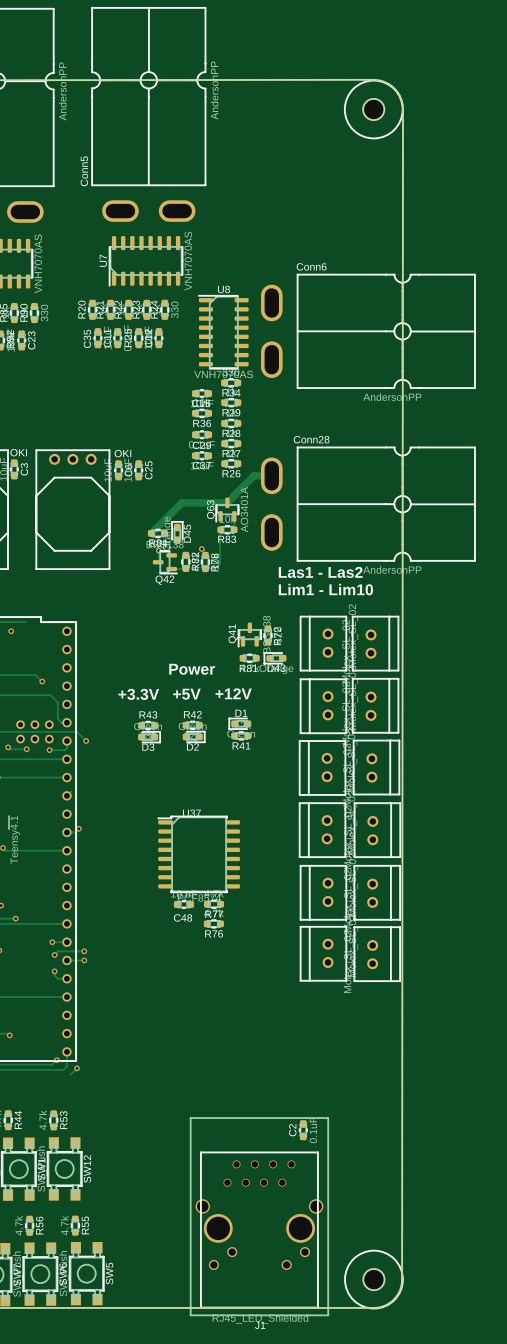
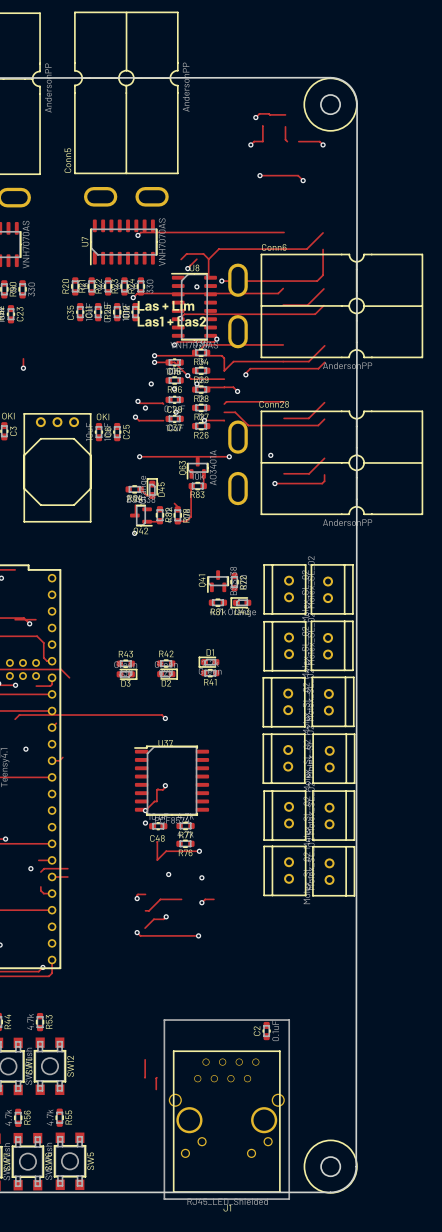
track: none -> (285, 114) (259, 113) (255, 117)
via: none -> (255, 117)
track: none -> (262, 126) (262, 141) (254, 141) (250, 144)
track: none -> (285, 126) (285, 139) (287, 141)
track: none -> (298, 141) (319, 141) (323, 144)
via: none -> (250, 144)
via: none -> (323, 144)
track: none -> (259, 175) (298, 175) (303, 180)
via: none -> (259, 175)
via: none -> (303, 180)
track: none -> (284, 232) (140, 232) (137, 235)
track: none -> (323, 232) (306, 249) (218, 249) (208, 259) (208, 277)
via: none -> (137, 235)
track: none -> (323, 249) (323, 275) (317, 281) (221, 281)
track: none -> (196, 259) (187, 268)
track: none -> (208, 259) (203, 253) (186, 253) (181, 259)
via: none -> (187, 268)
via: none -> (221, 281)
via: none -> (196, 286)
track: none -> (283, 288) (278, 293) (137, 293) (133, 297)
track: none -> (323, 288) (307, 305) (283, 305)
via: none -> (133, 297)
text: none -> Las + Lim (165, 305)
track: none -> (323, 305) (315, 314) (184, 314) (180, 318)
via: none -> (180, 318)
text: none -> Las1 + Las2 (171, 321)
track: none -> (216, 339) (213, 342) (177, 342) (174, 344)
via: none -> (216, 339)
via: none -> (174, 344)
track: none -> (283, 344) (204, 344) (201, 348)
track: none -> (324, 345) (308, 361) (233, 361) (224, 370) (224, 358) (221, 355) (154, 355)
via: none -> (154, 355)
track: none -> (23, 358) (23, 368)
track: none -> (154, 362) (174, 362) (191, 379) (224, 379)
via: none -> (154, 362)
track: none -> (324, 362) (318, 368) (250, 368) (245, 374)
via: none -> (23, 368)
via: none -> (245, 374)
via: none -> (187, 375)
via: none -> (151, 383)
track: none -> (196, 383) (200, 387) (233, 387) (237, 391)
via: none -> (196, 383)
via: none -> (174, 388)
via: none -> (237, 391)
track: none -> (137, 401) (139, 403) (163, 404)
via: none -> (137, 401)
track: none -> (284, 401) (226, 401) (224, 404)
track: none -> (324, 402) (308, 418) (284, 418)
via: none -> (145, 408)
via: none -> (176, 412)
track: none -> (224, 412) (235, 412) (248, 425) (318, 425) (324, 419)
track: none -> (135, 417) (139, 420) (163, 420)
via: none -> (135, 417)
track: none -> (204, 420) (224, 420)
via: none -> (204, 420)
track: (271, 475) (253, 475) (227, 502) (181, 502) (151, 533) -> none
via: none -> (270, 455)
track: none -> (139, 456) (229, 456)
via: none -> (139, 456)
via: none -> (229, 456)
track: none -> (324, 458) (309, 473) (284, 473)
track: none -> (324, 474) (324, 481) (322, 483) (274, 483)
via: none -> (274, 483)
via: (201, 548) -> none
via: (158, 550) -> none
text: Las1 - Las2 (320, 572) -> none
via: none -> (134, 533)
text: Lim1 - Lim10 (325, 589) -> none
text: Power (192, 669) -> none
track: none -> (15, 619) (35, 619)
text: +12V (233, 693) -> none
text: +3.3V (138, 694) -> none
text: +5V (186, 694) -> none
via: (86, 741) -> none
via: (49, 750) -> none
track: none -> (165, 718) (161, 715) (19, 715) (15, 719)
via: none -> (165, 718)
via: none -> (25, 749)
via: (78, 828) -> none
track: none -> (165, 785) (162, 789) (157, 789)
via: none -> (165, 785)
track: none -> (158, 789) (156, 801) (145, 810)
via: none -> (145, 810)
via: none -> (145, 823)
track: none -> (157, 841) (157, 860) (166, 851) (199, 851)
via: none -> (199, 851)
via: (52, 942) -> none
via: none -> (30, 868)
via: (84, 951) -> none
via: (54, 954) -> none
via: none -> (168, 874)
via: (84, 960) -> none
via: none -> (201, 877)
via: (54, 971) -> none
track: none -> (145, 894) (137, 894) (137, 898)
via: none -> (137, 898)
track: none -> (181, 899) (160, 899) (149, 910) (145, 910)
track: none -> (213, 899) (205, 899) (201, 902)
via: none -> (201, 902)
track: none -> (166, 916) (163, 919) (153, 919) (145, 928)
via: none -> (166, 916)
track: none -> (137, 932) (140, 935) (198, 935)
via: none -> (137, 932)
via: none -> (198, 935)
track: (77, 1068) (70, 1074) -> none
via: (77, 1068) -> none
track: none -> (145, 1059) (144, 1077)
track: none -> (156, 1077) (156, 1089)

